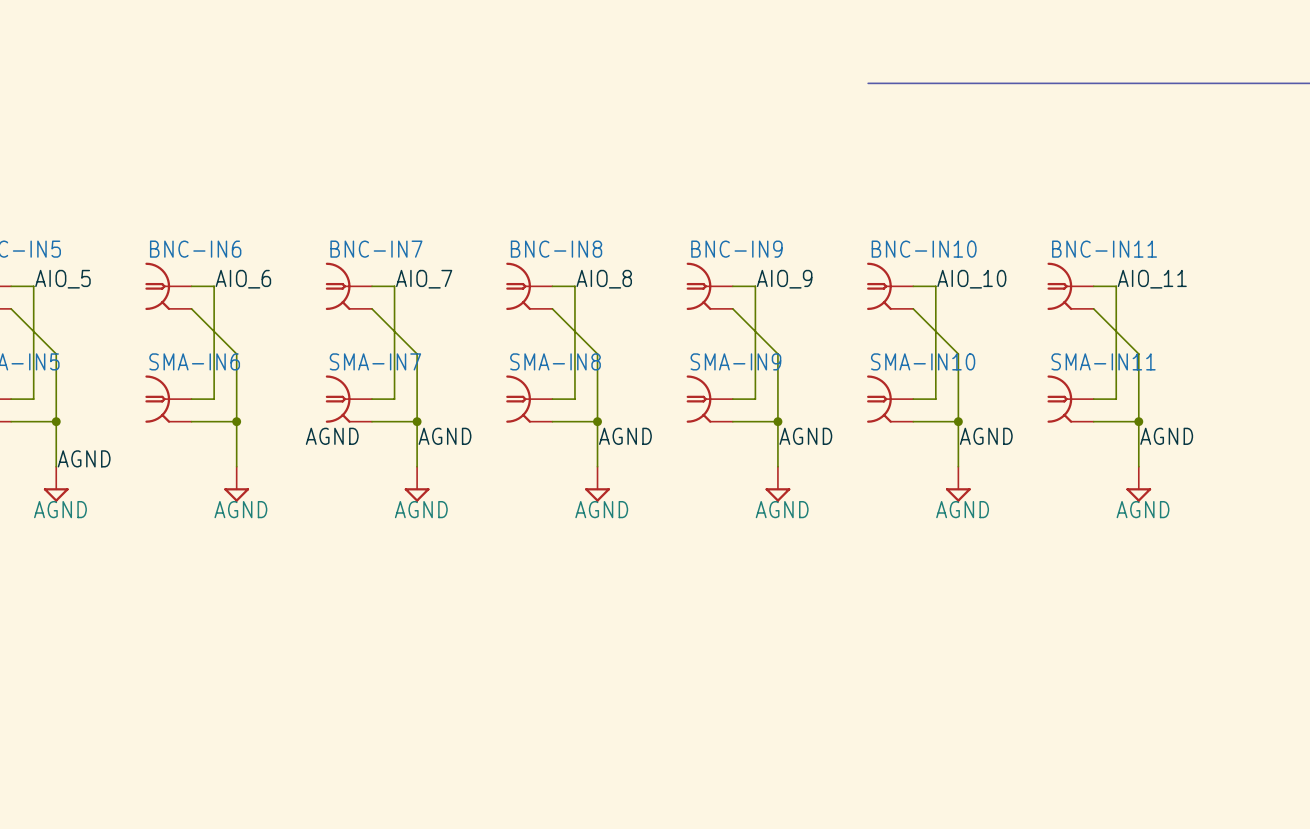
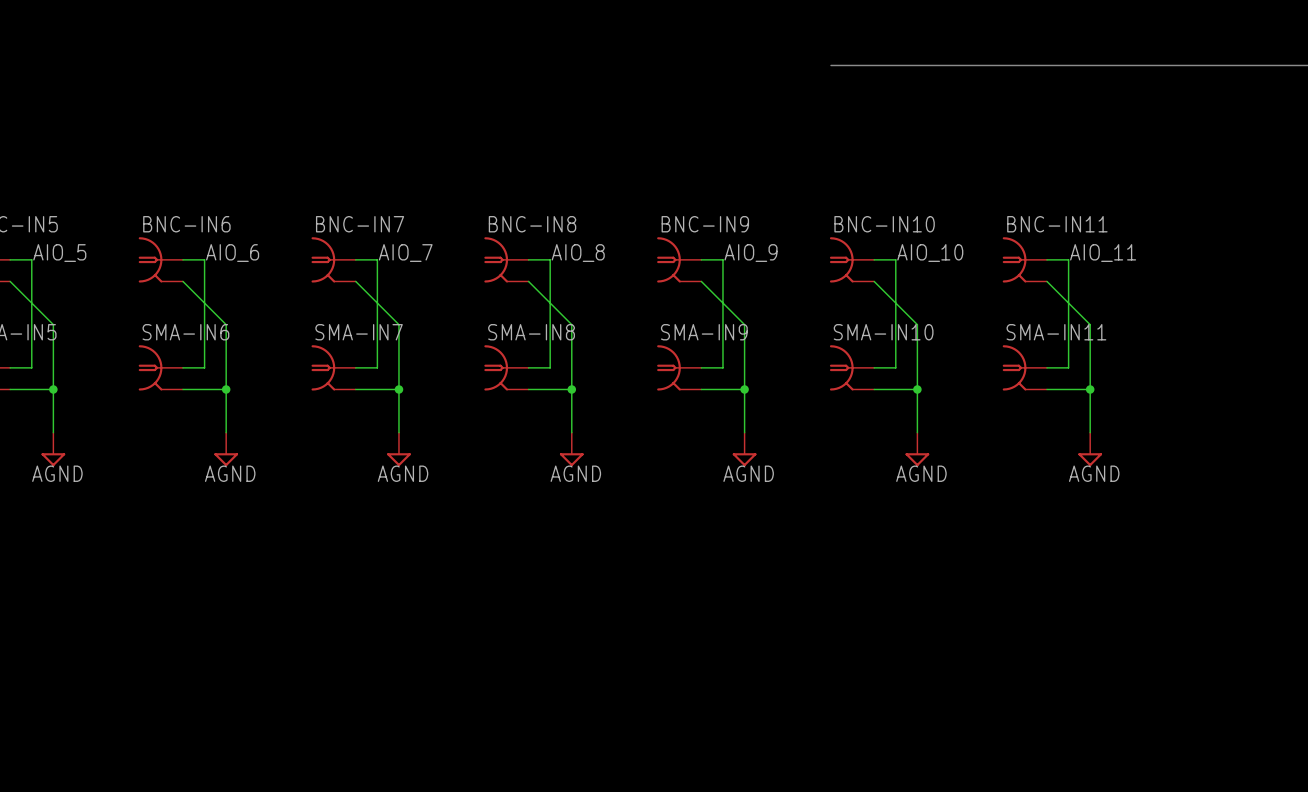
label: AGND (332, 436) -> none
label: AGND (444, 436) -> none
label: AGND (625, 436) -> none
label: AGND (805, 436) -> none
label: AGND (986, 436) -> none
label: AGND (1166, 436) -> none
label: AGND (84, 458) -> none

